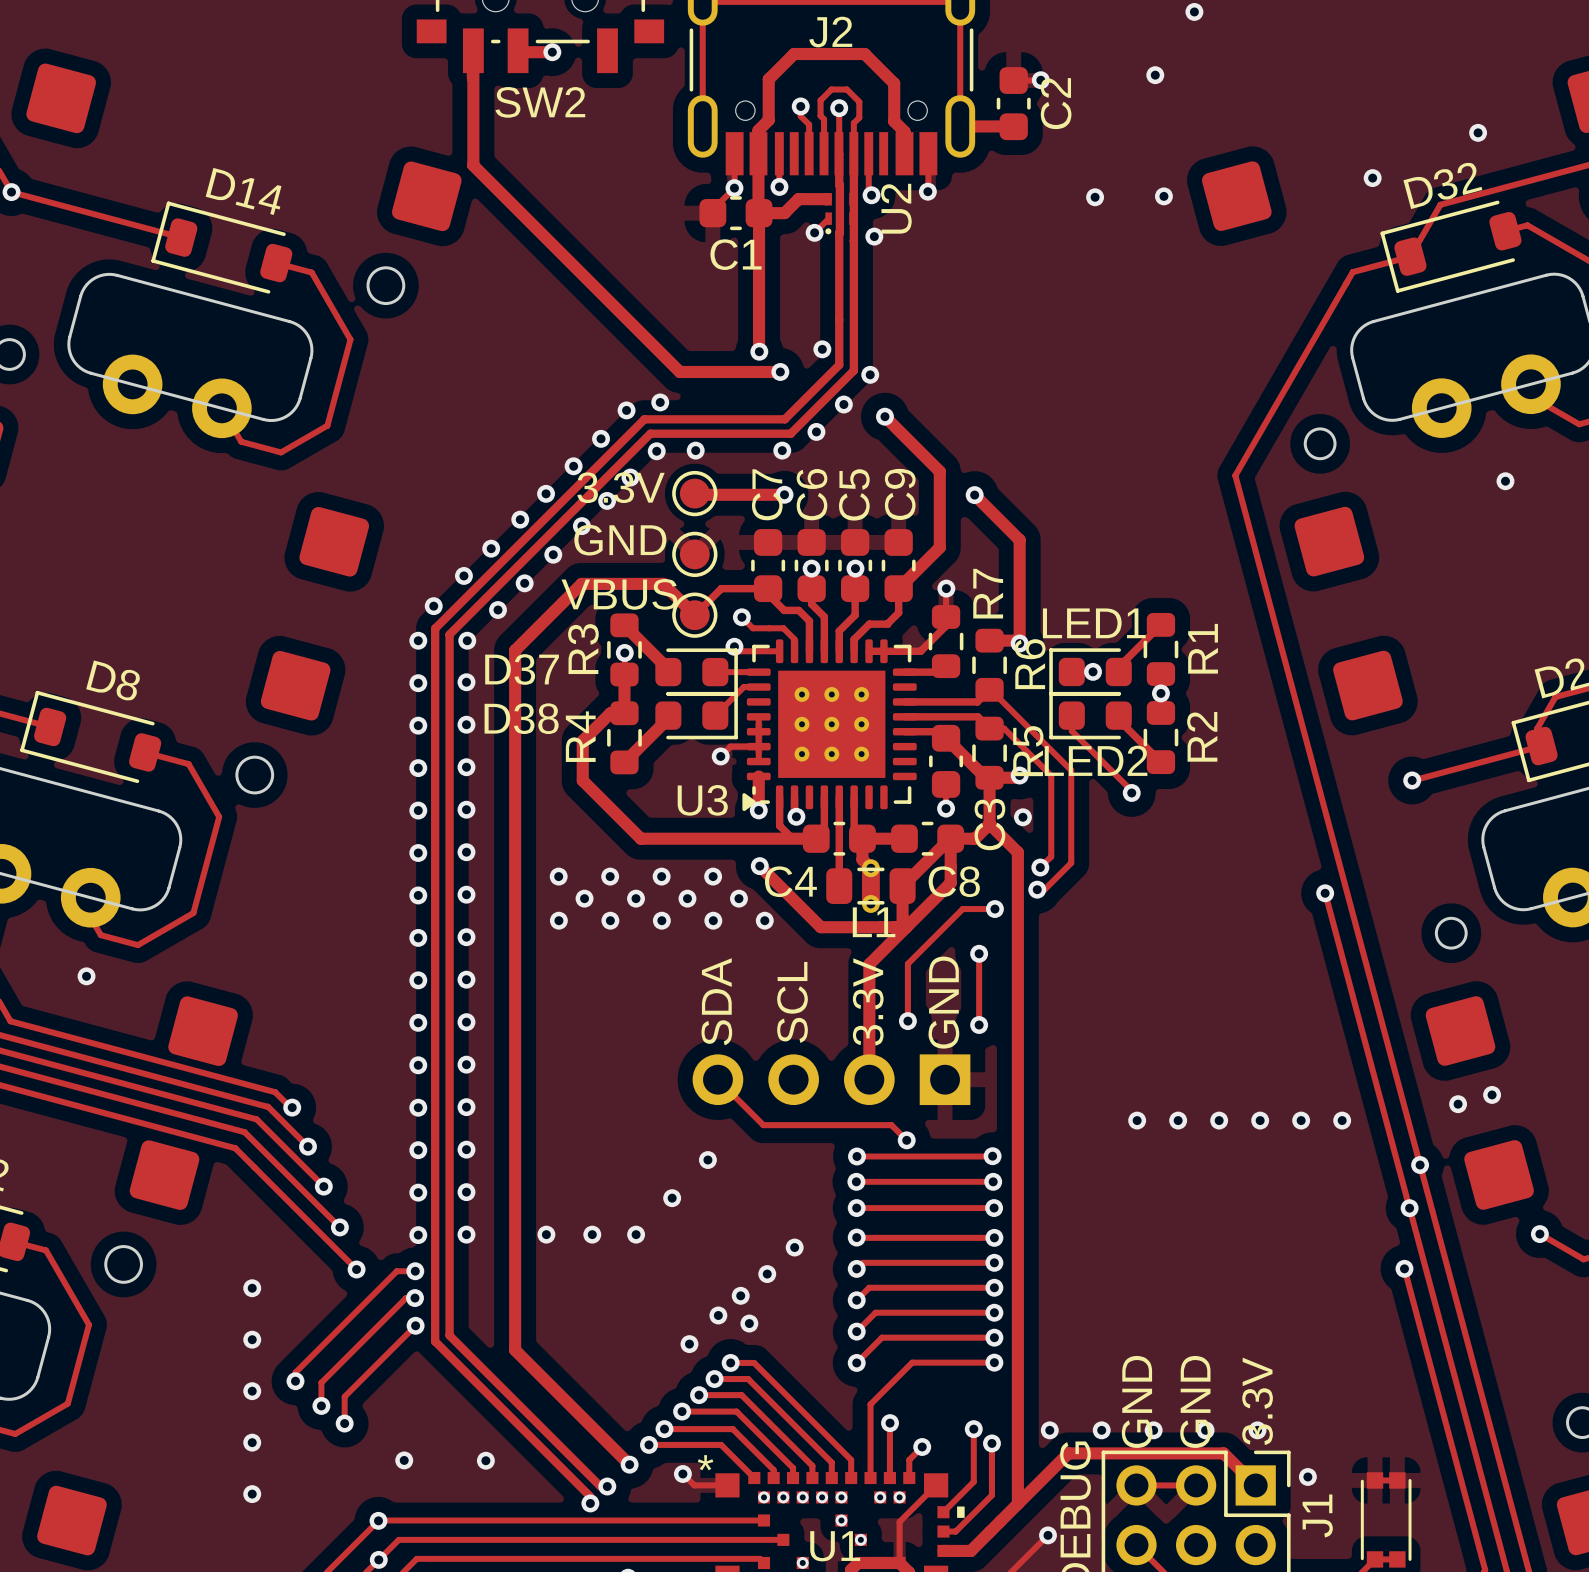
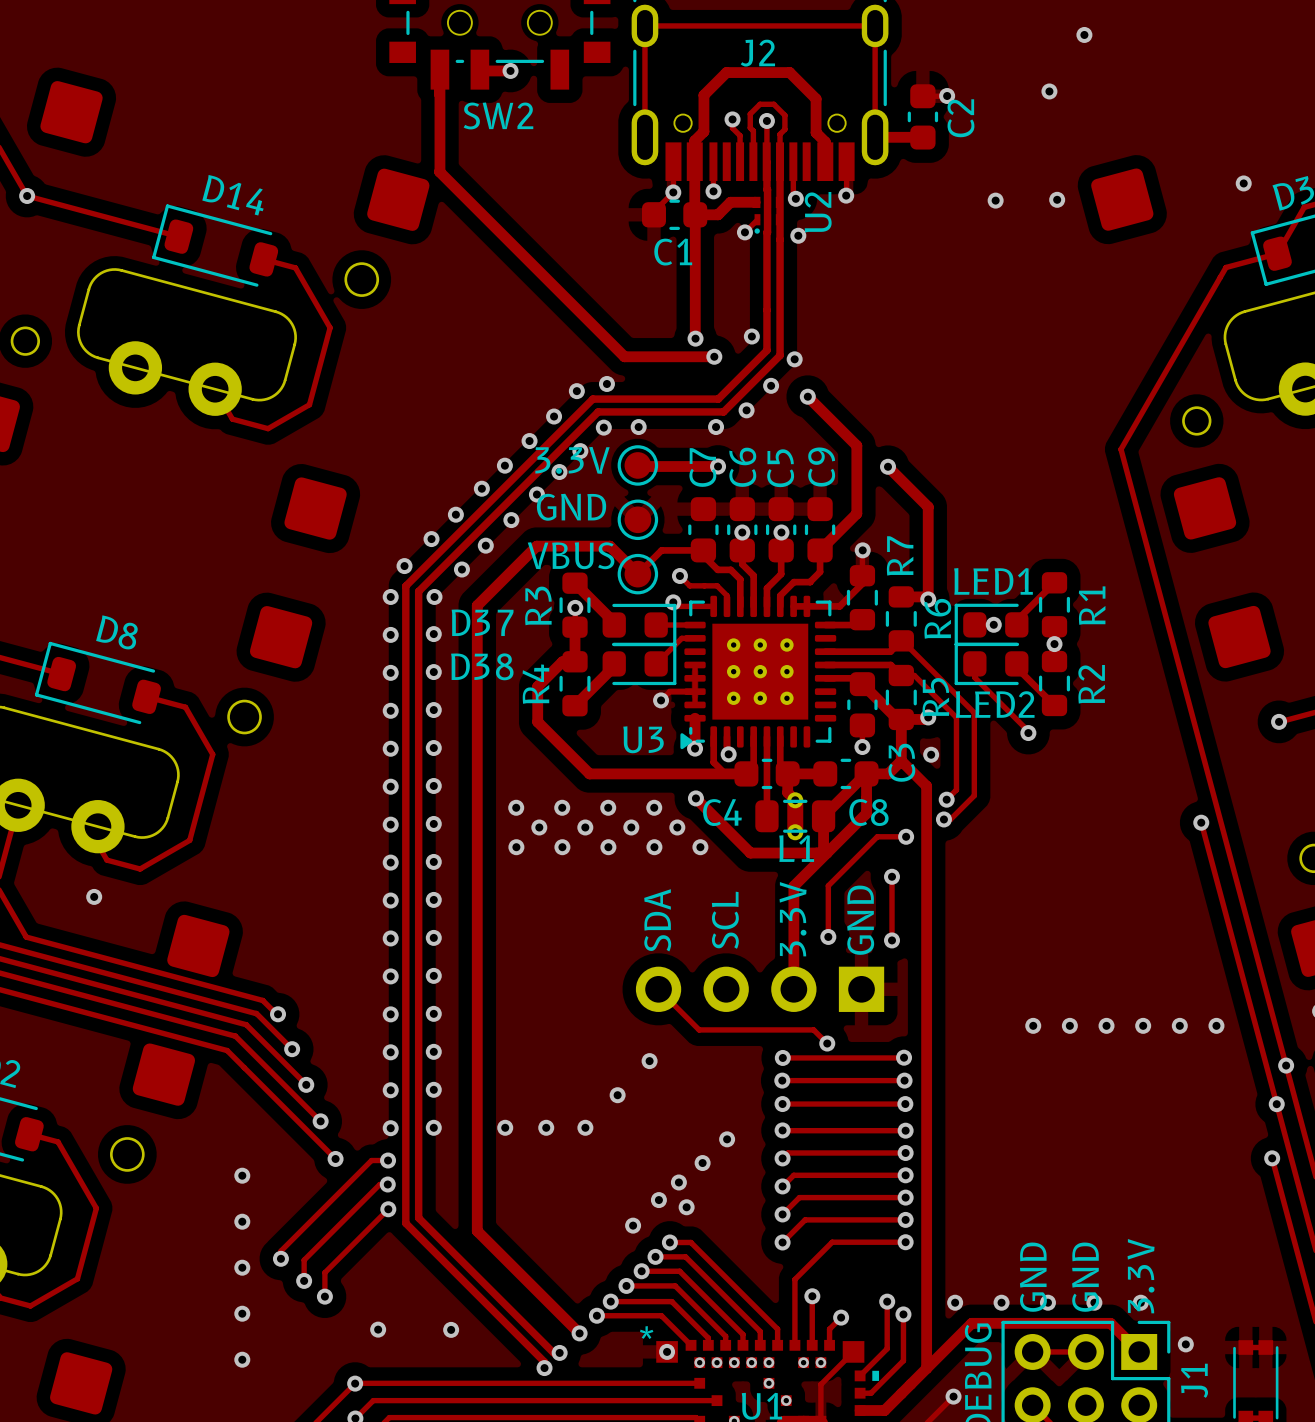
track: (682, 1473) (694, 1485) (727, 1485) -> none
via position: (682, 1473) -> (667, 1351)

